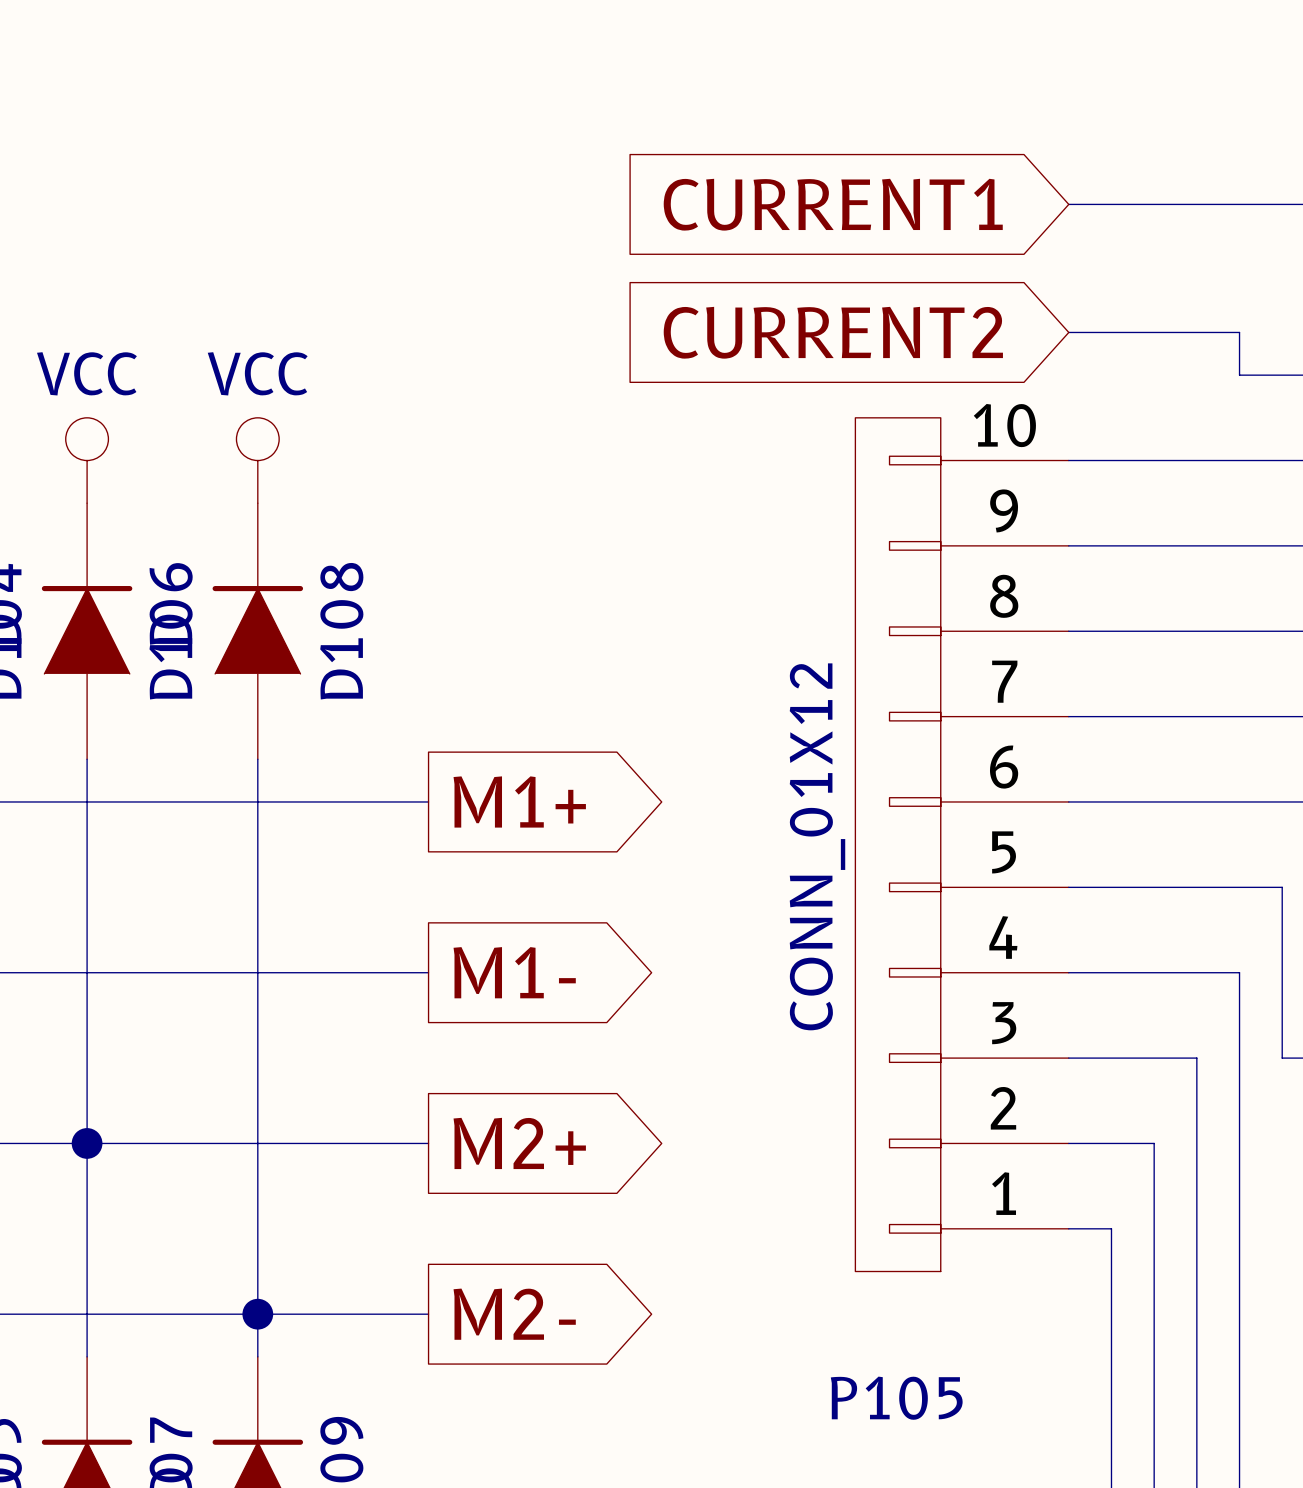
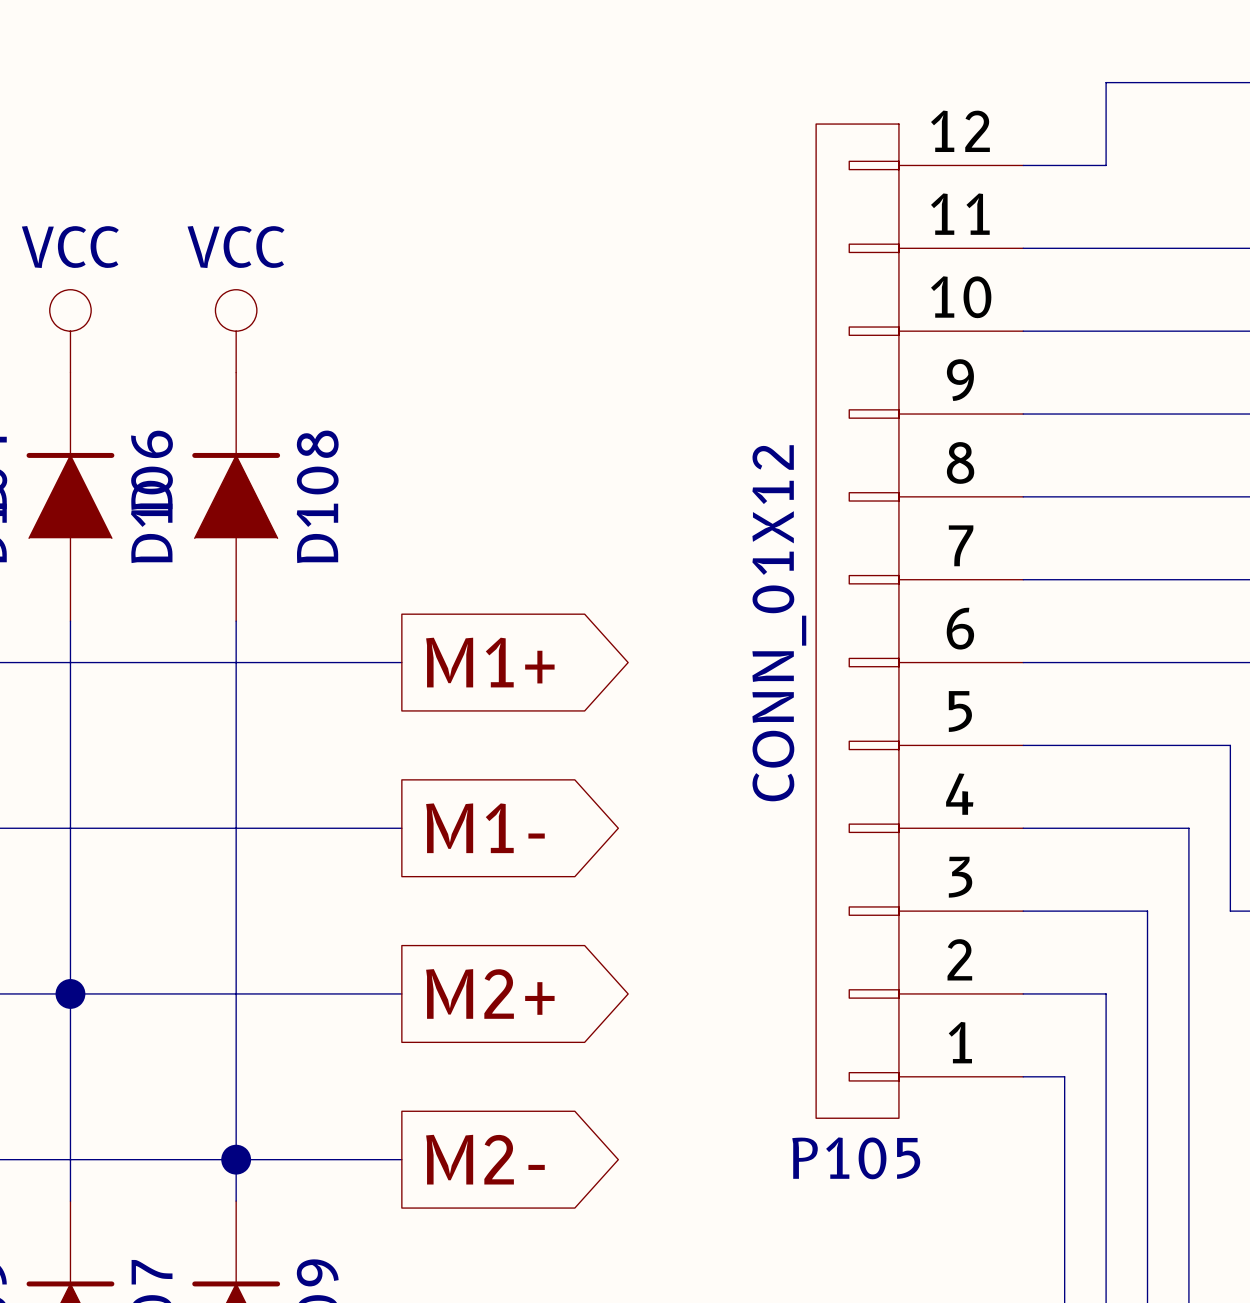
global label: CURRENT1 (833, 204) -> none
wire: (1068, 204) (1154, 204) -> (1023, 165) (1106, 165) (1106, 82)
global label: CURRENT2 (833, 332) -> none
wire: (1068, 332) (1239, 332) (1239, 375) -> (1023, 248) (1188, 248)
P105 symbol: [855, 417, 1069, 1272] -> [816, 124, 1024, 1119]

